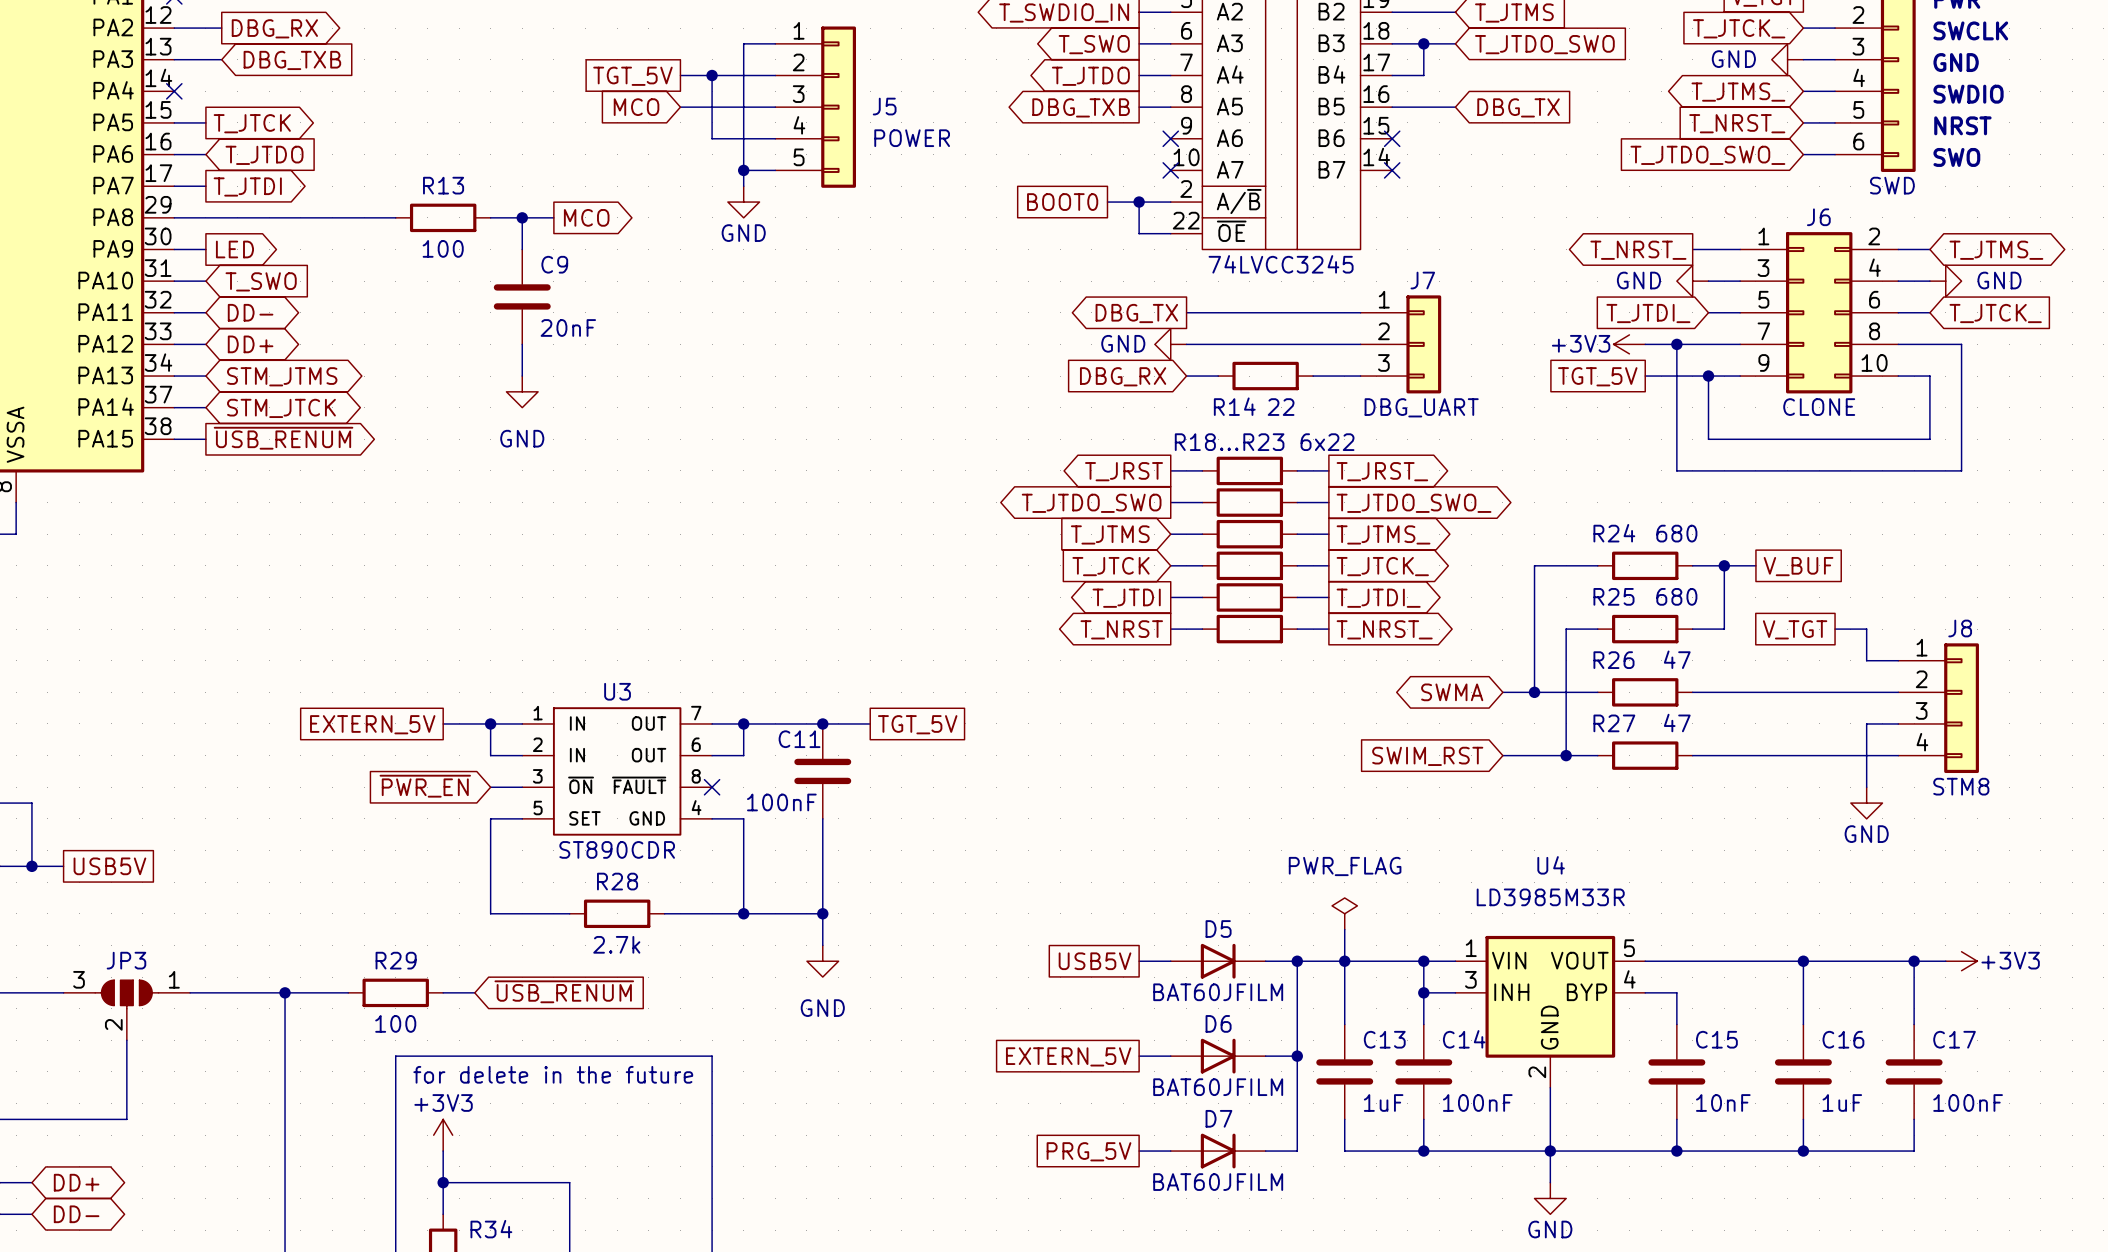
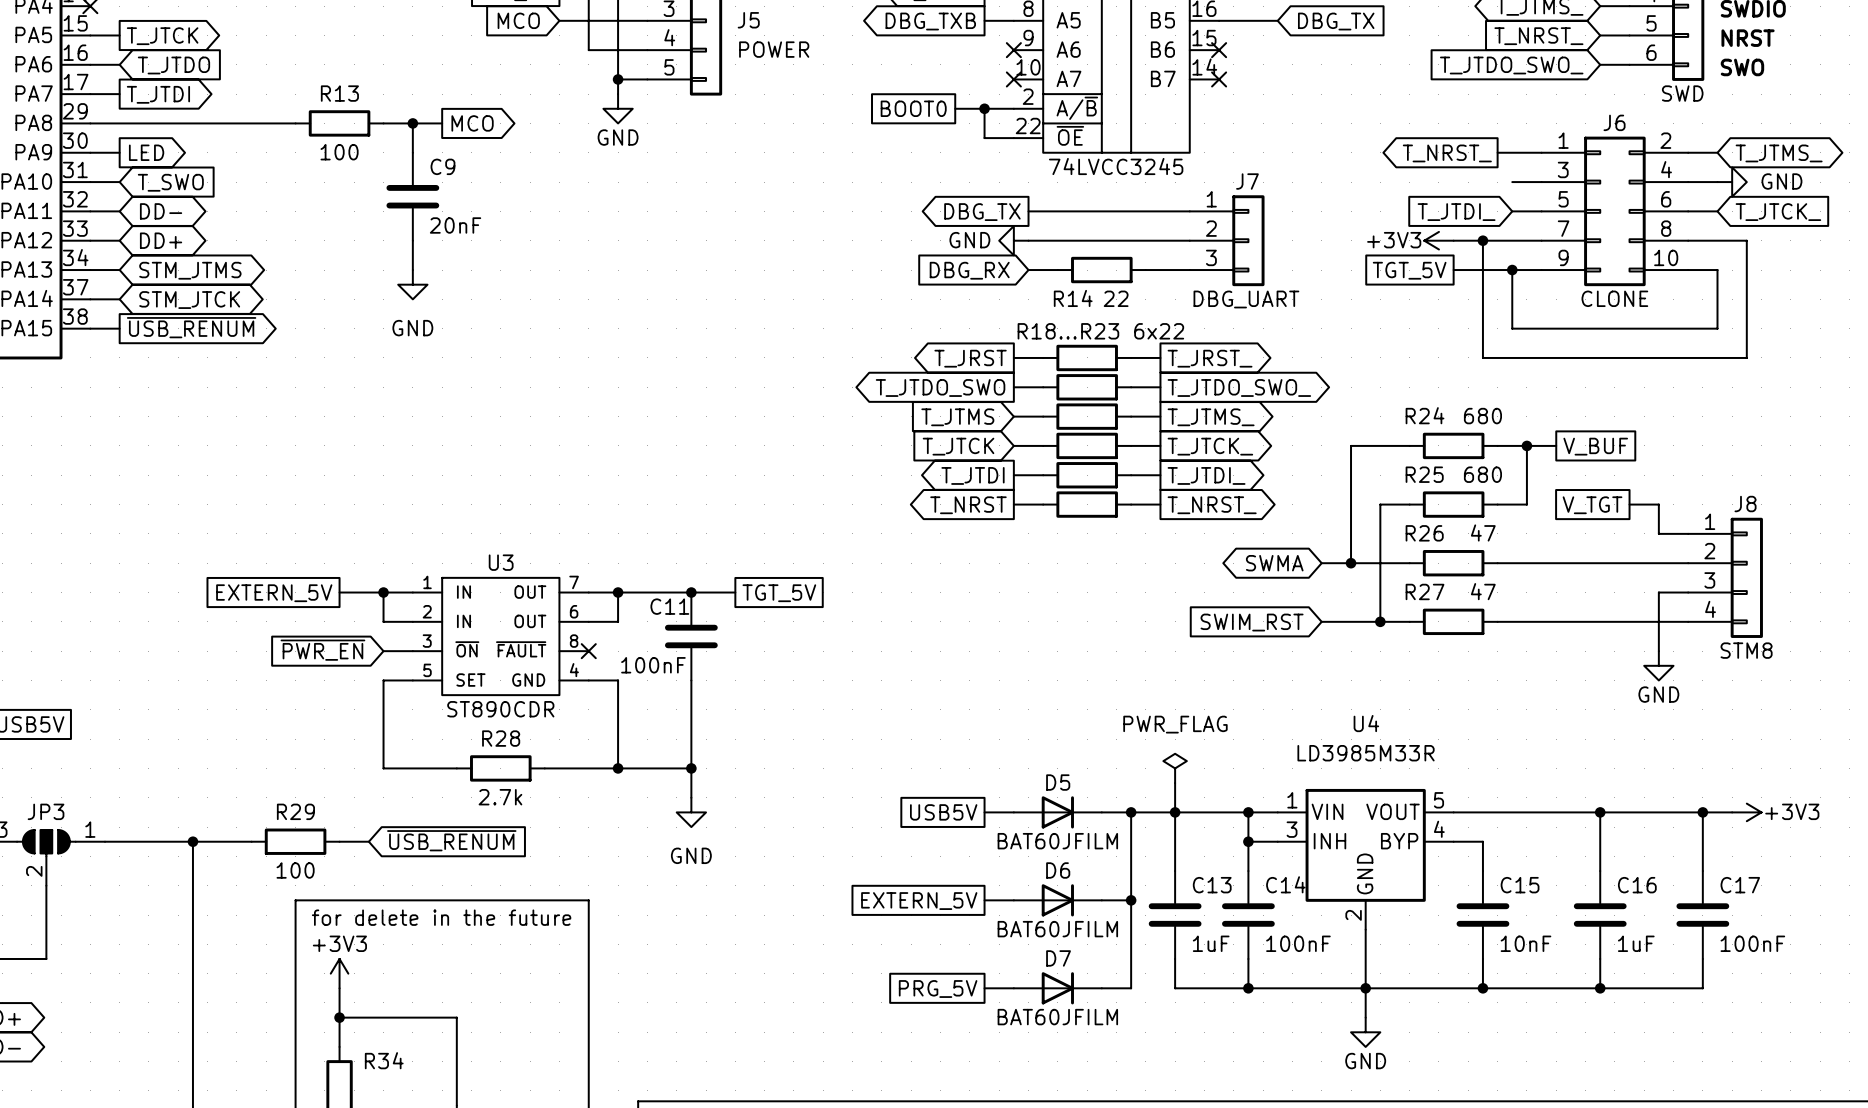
power symbol: GND (1692, 281) -> none

